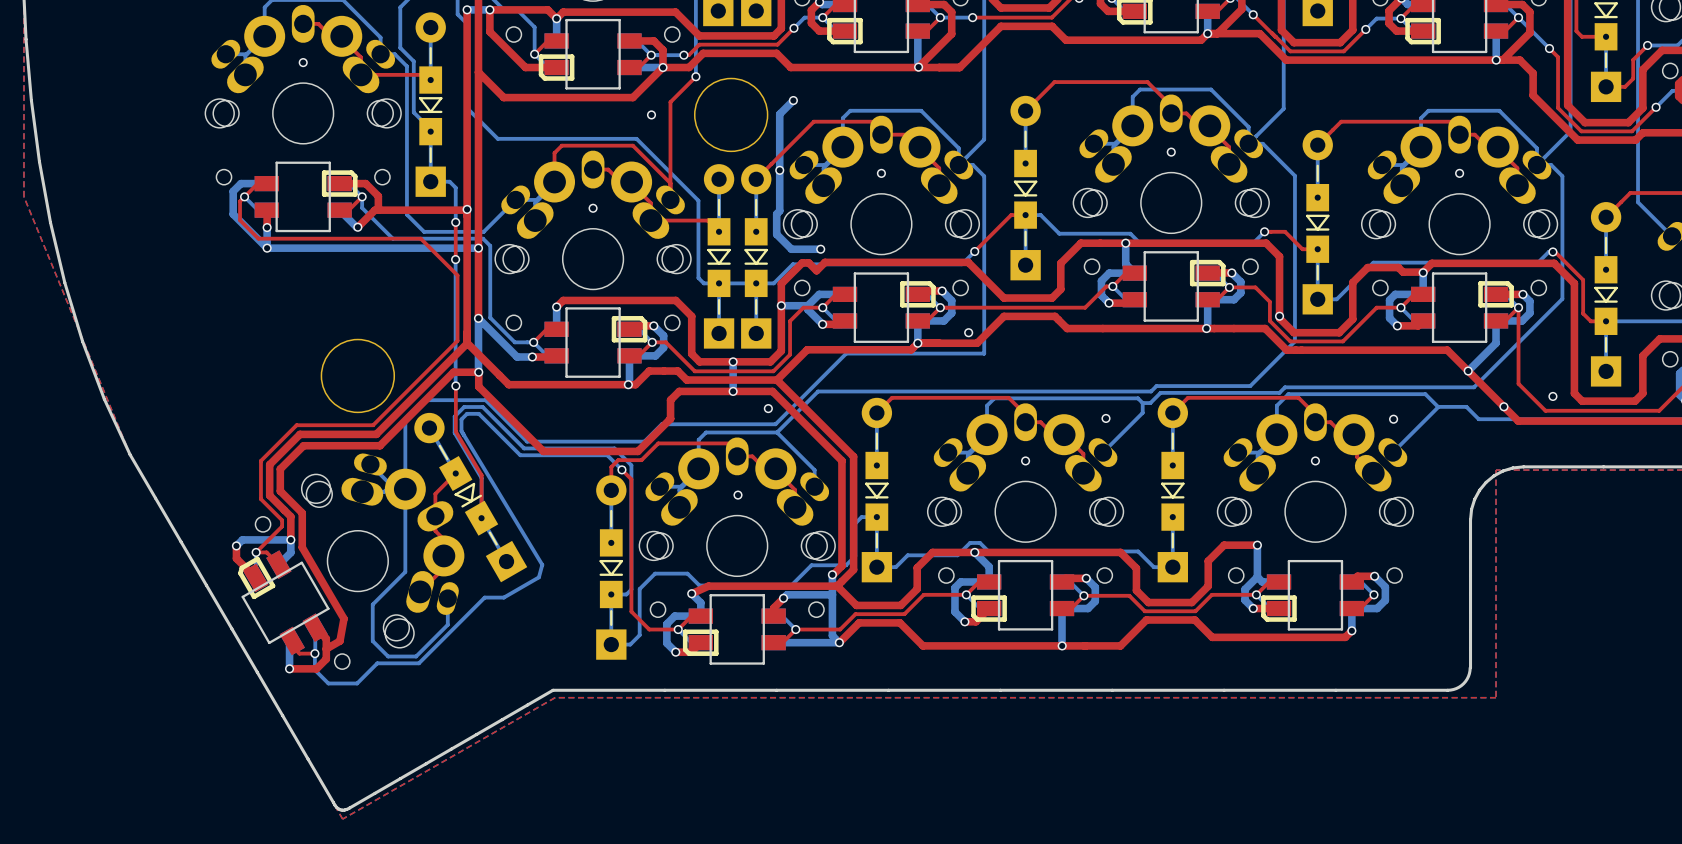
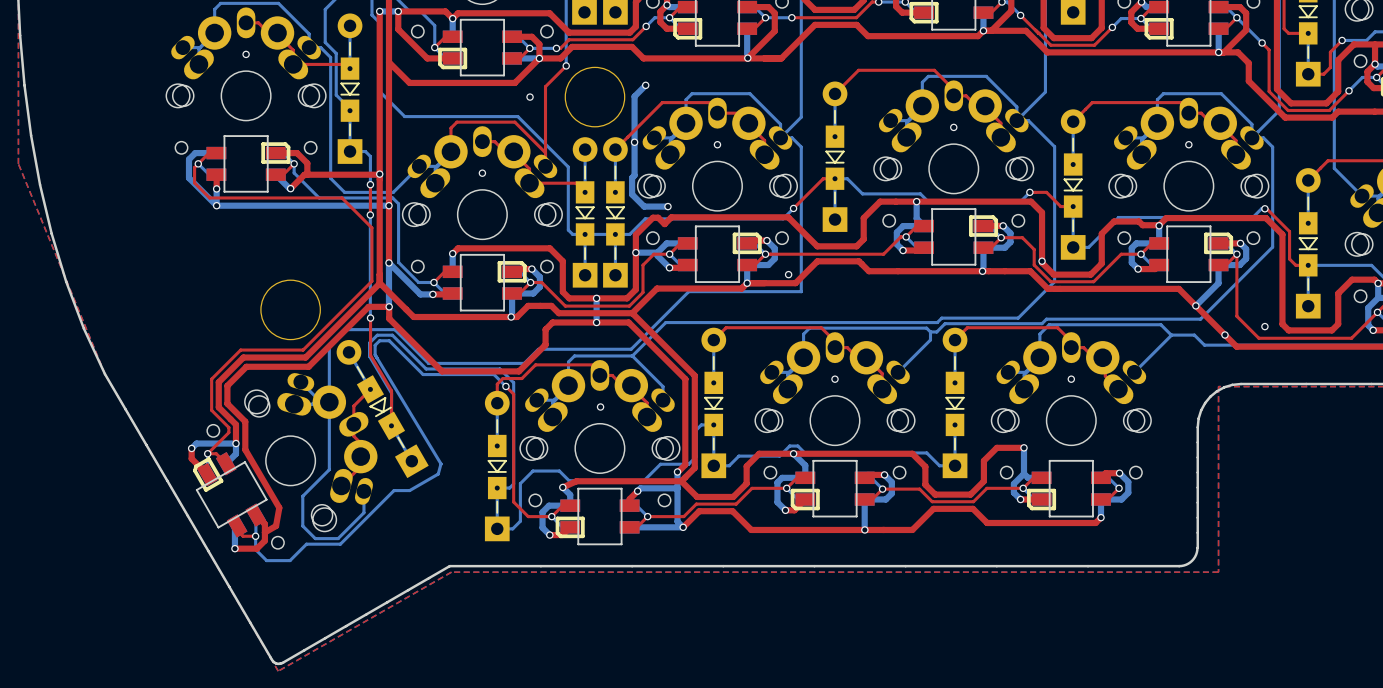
via: (768, 408) -> none
via: (1106, 418) -> none
via: (1393, 419) -> none

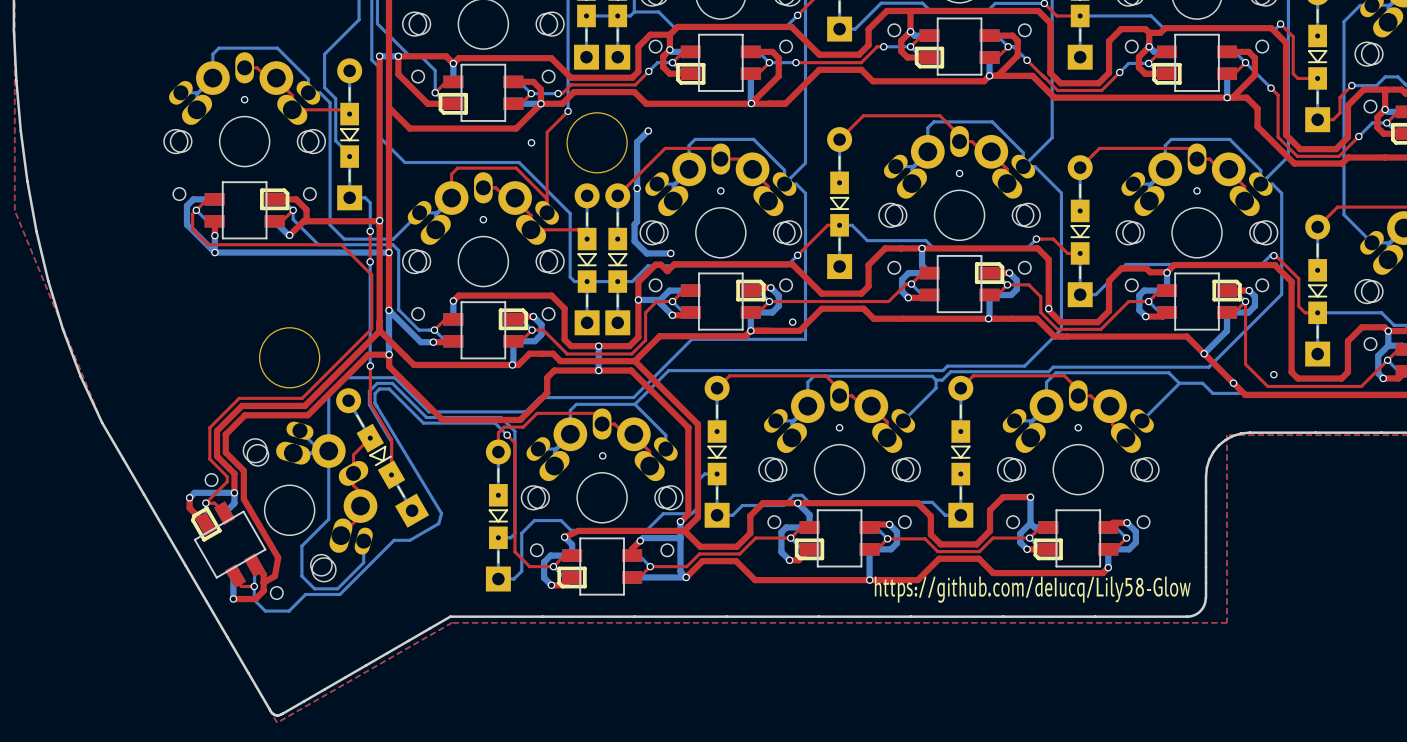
text: none -> https://github.com/deIucq/Lily58-Glow (1032, 589)

